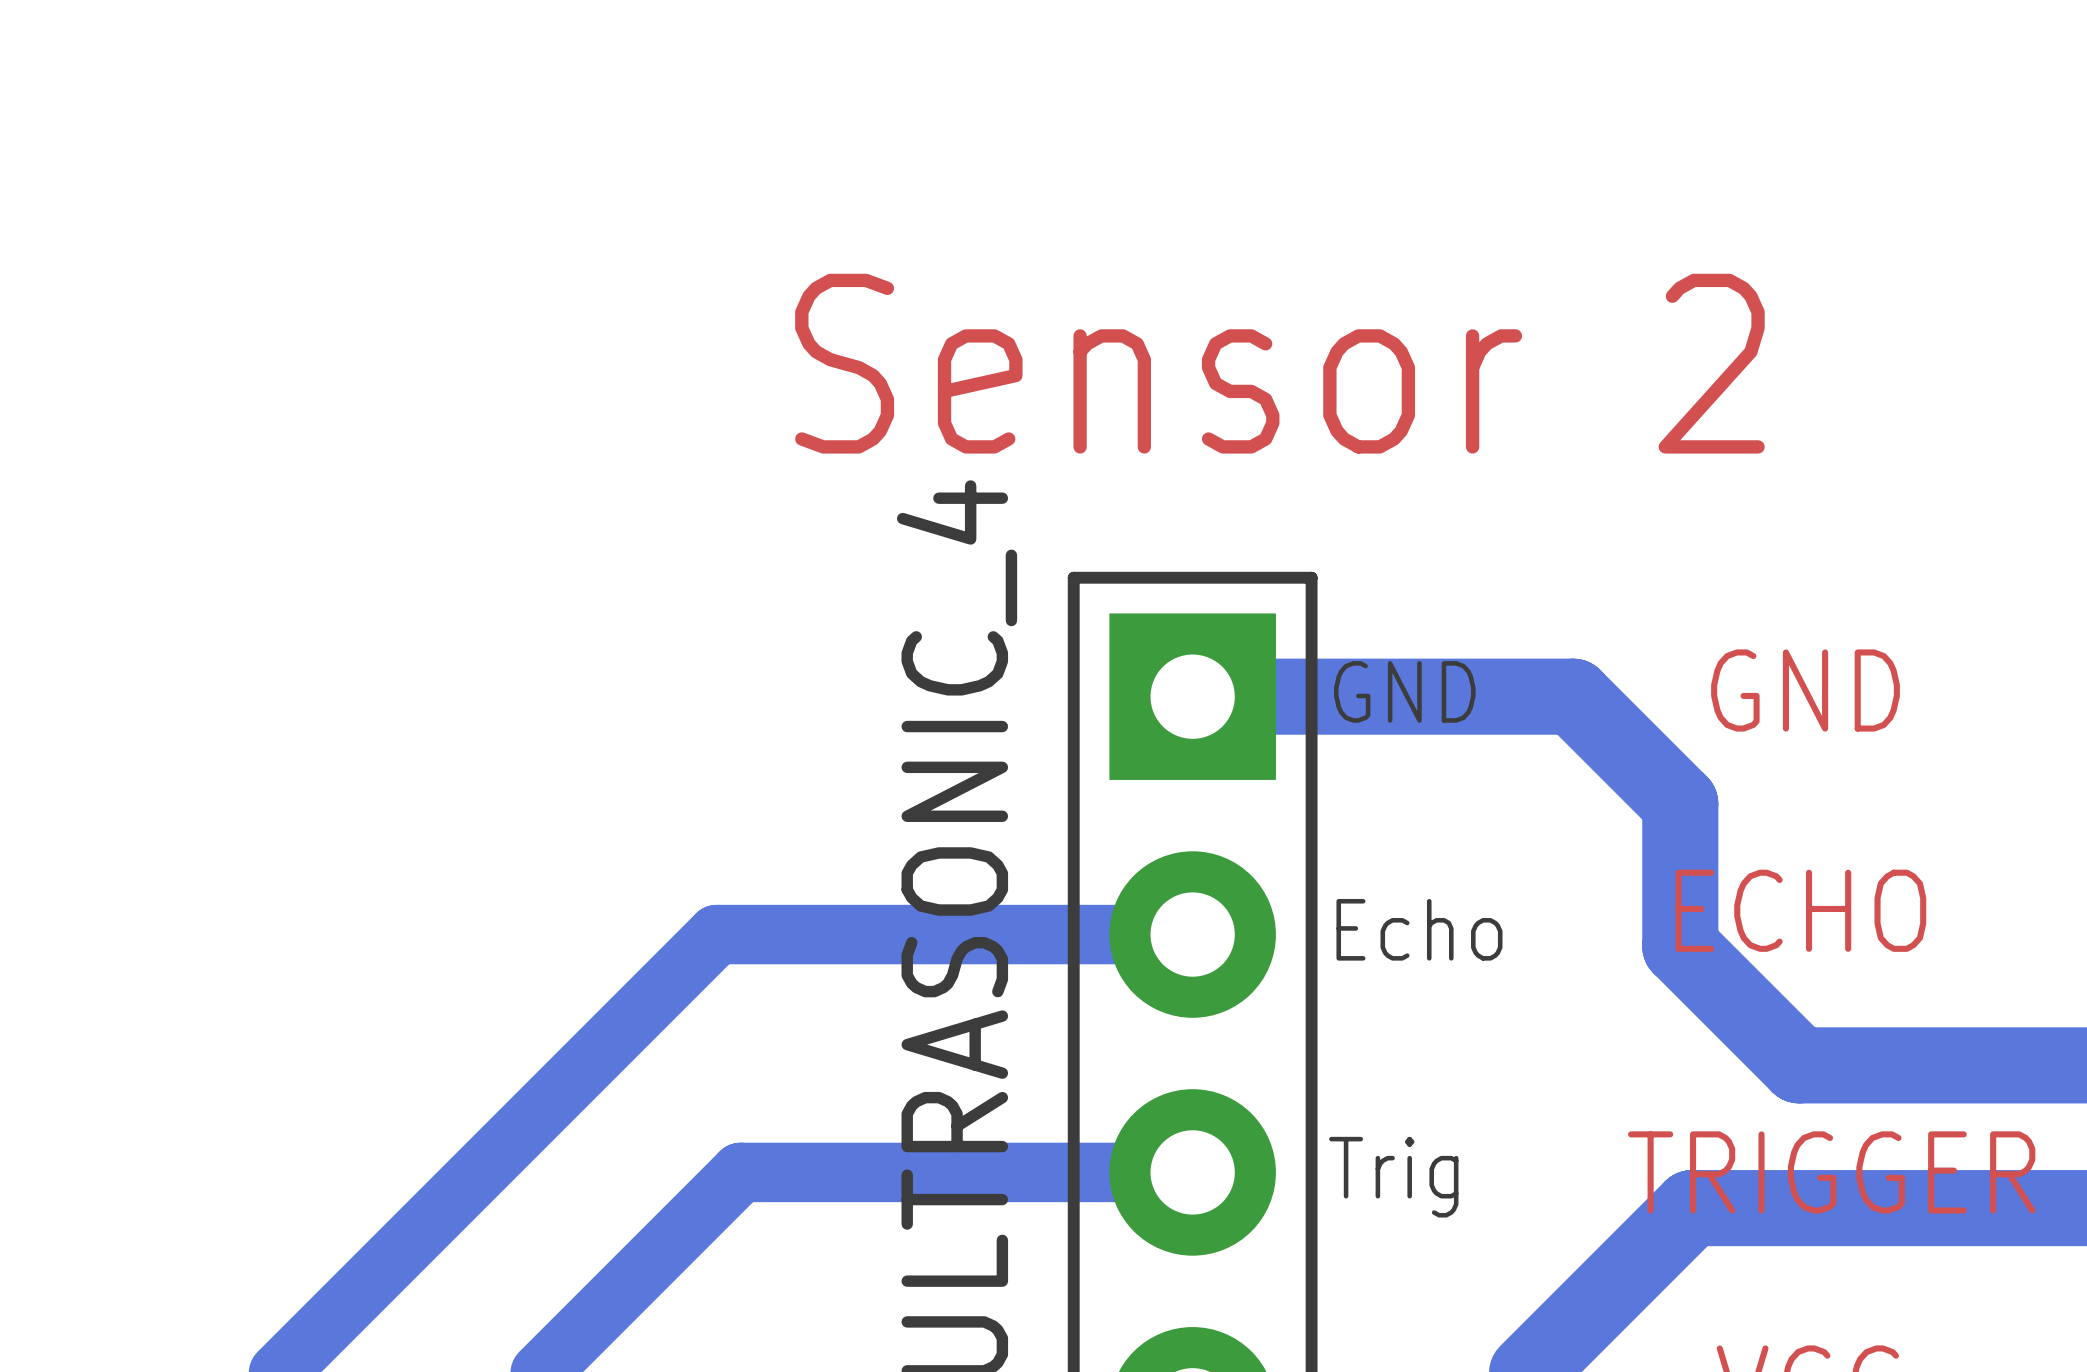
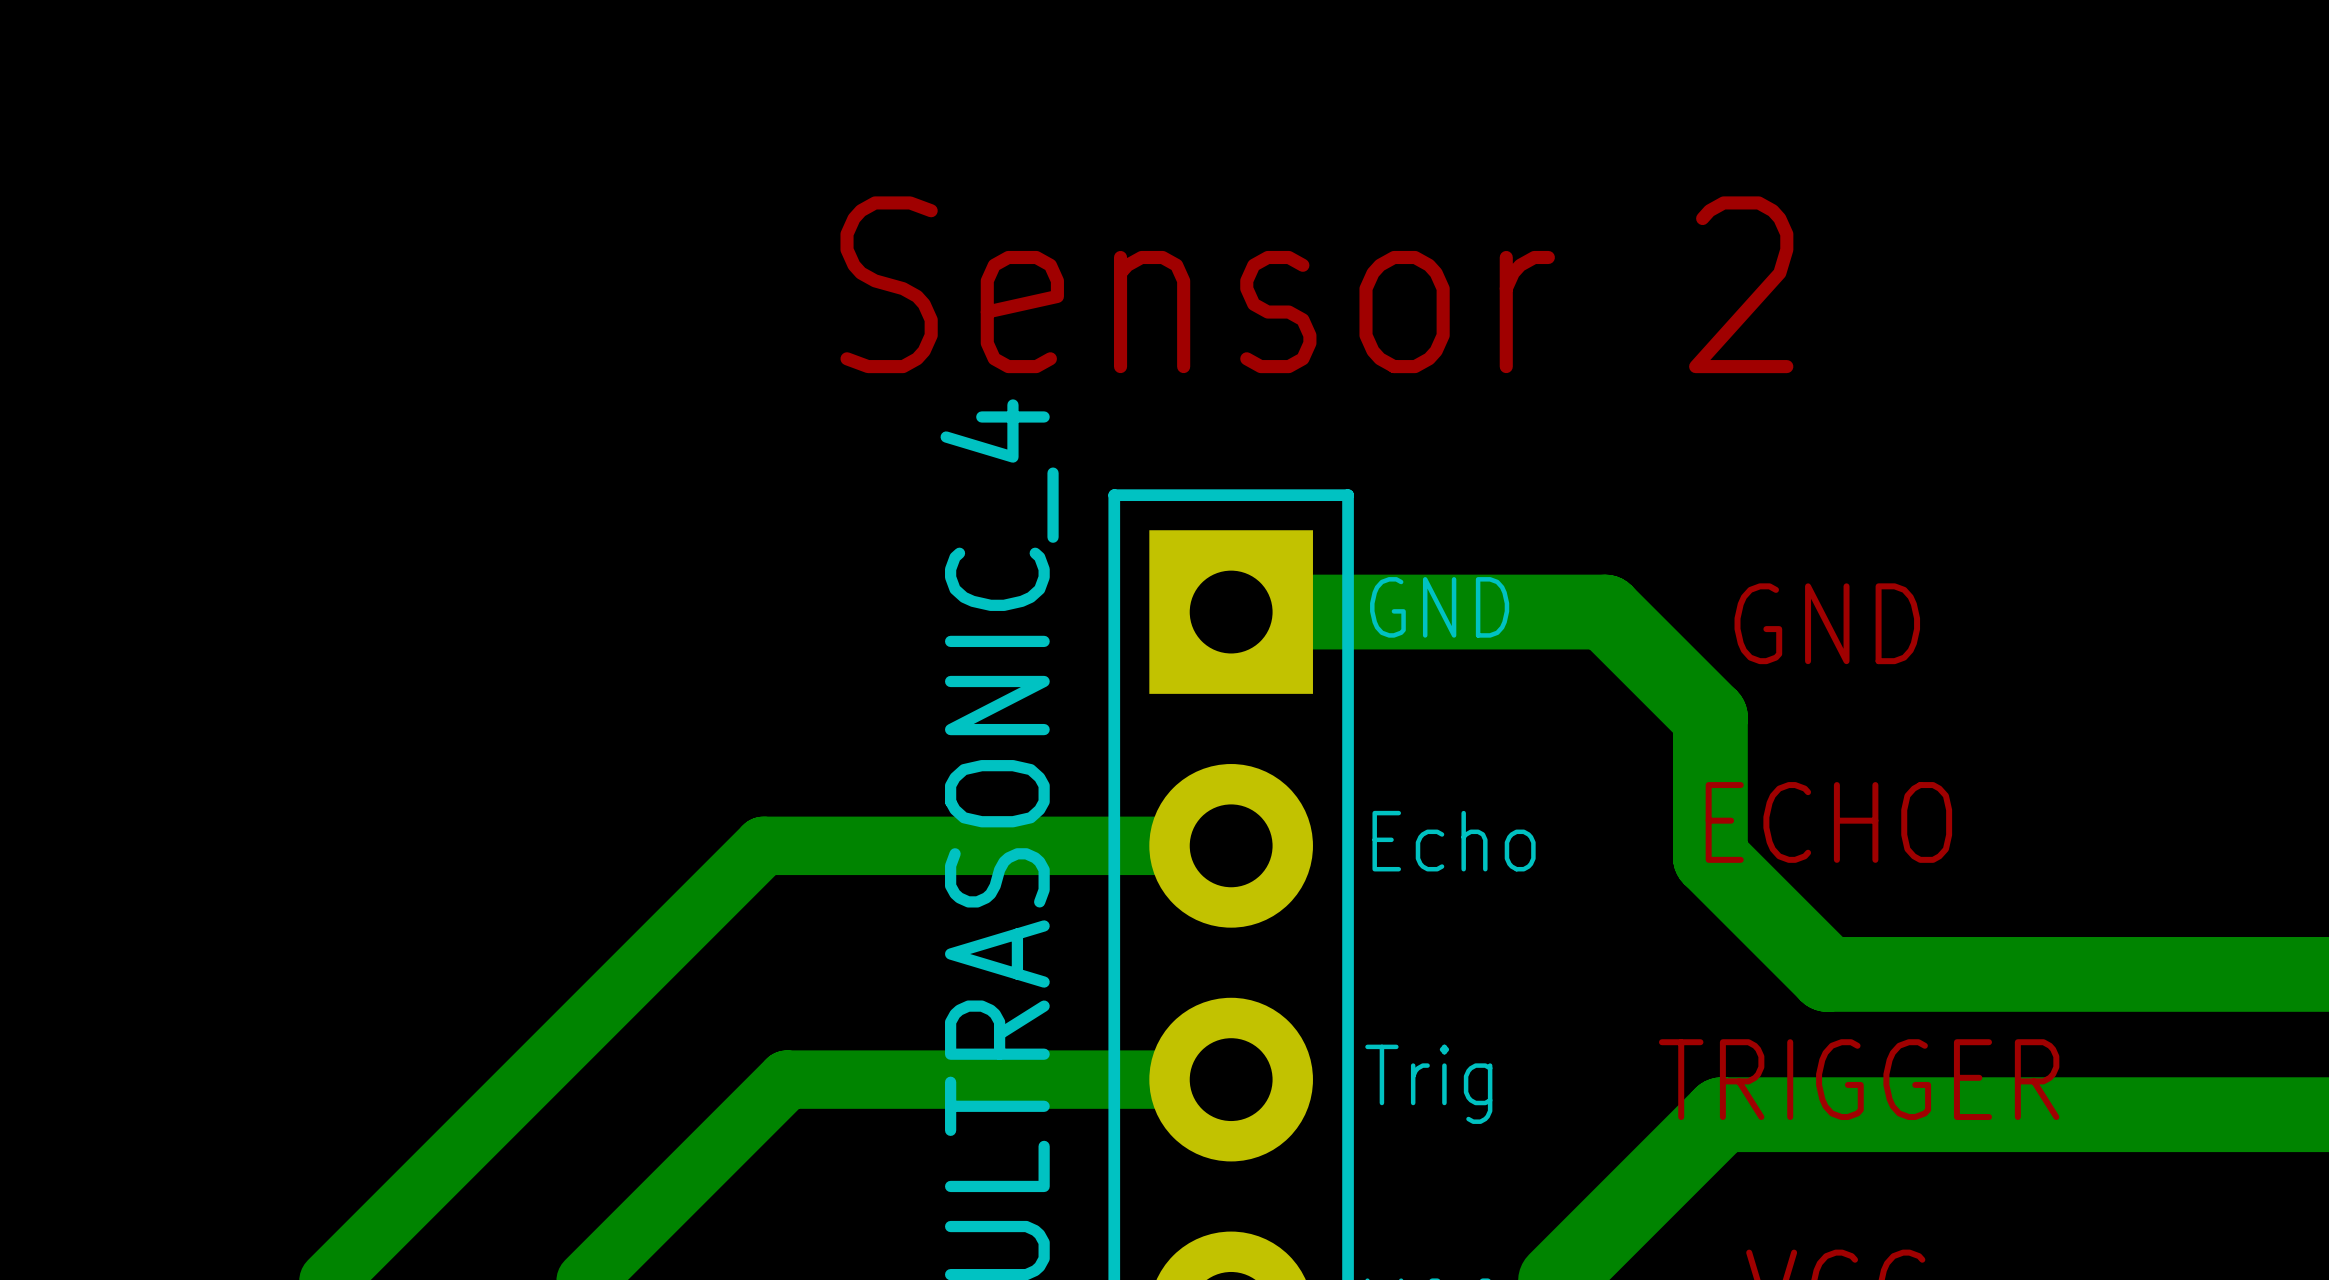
text position: GND (1805, 690) -> GND (1827, 623)

